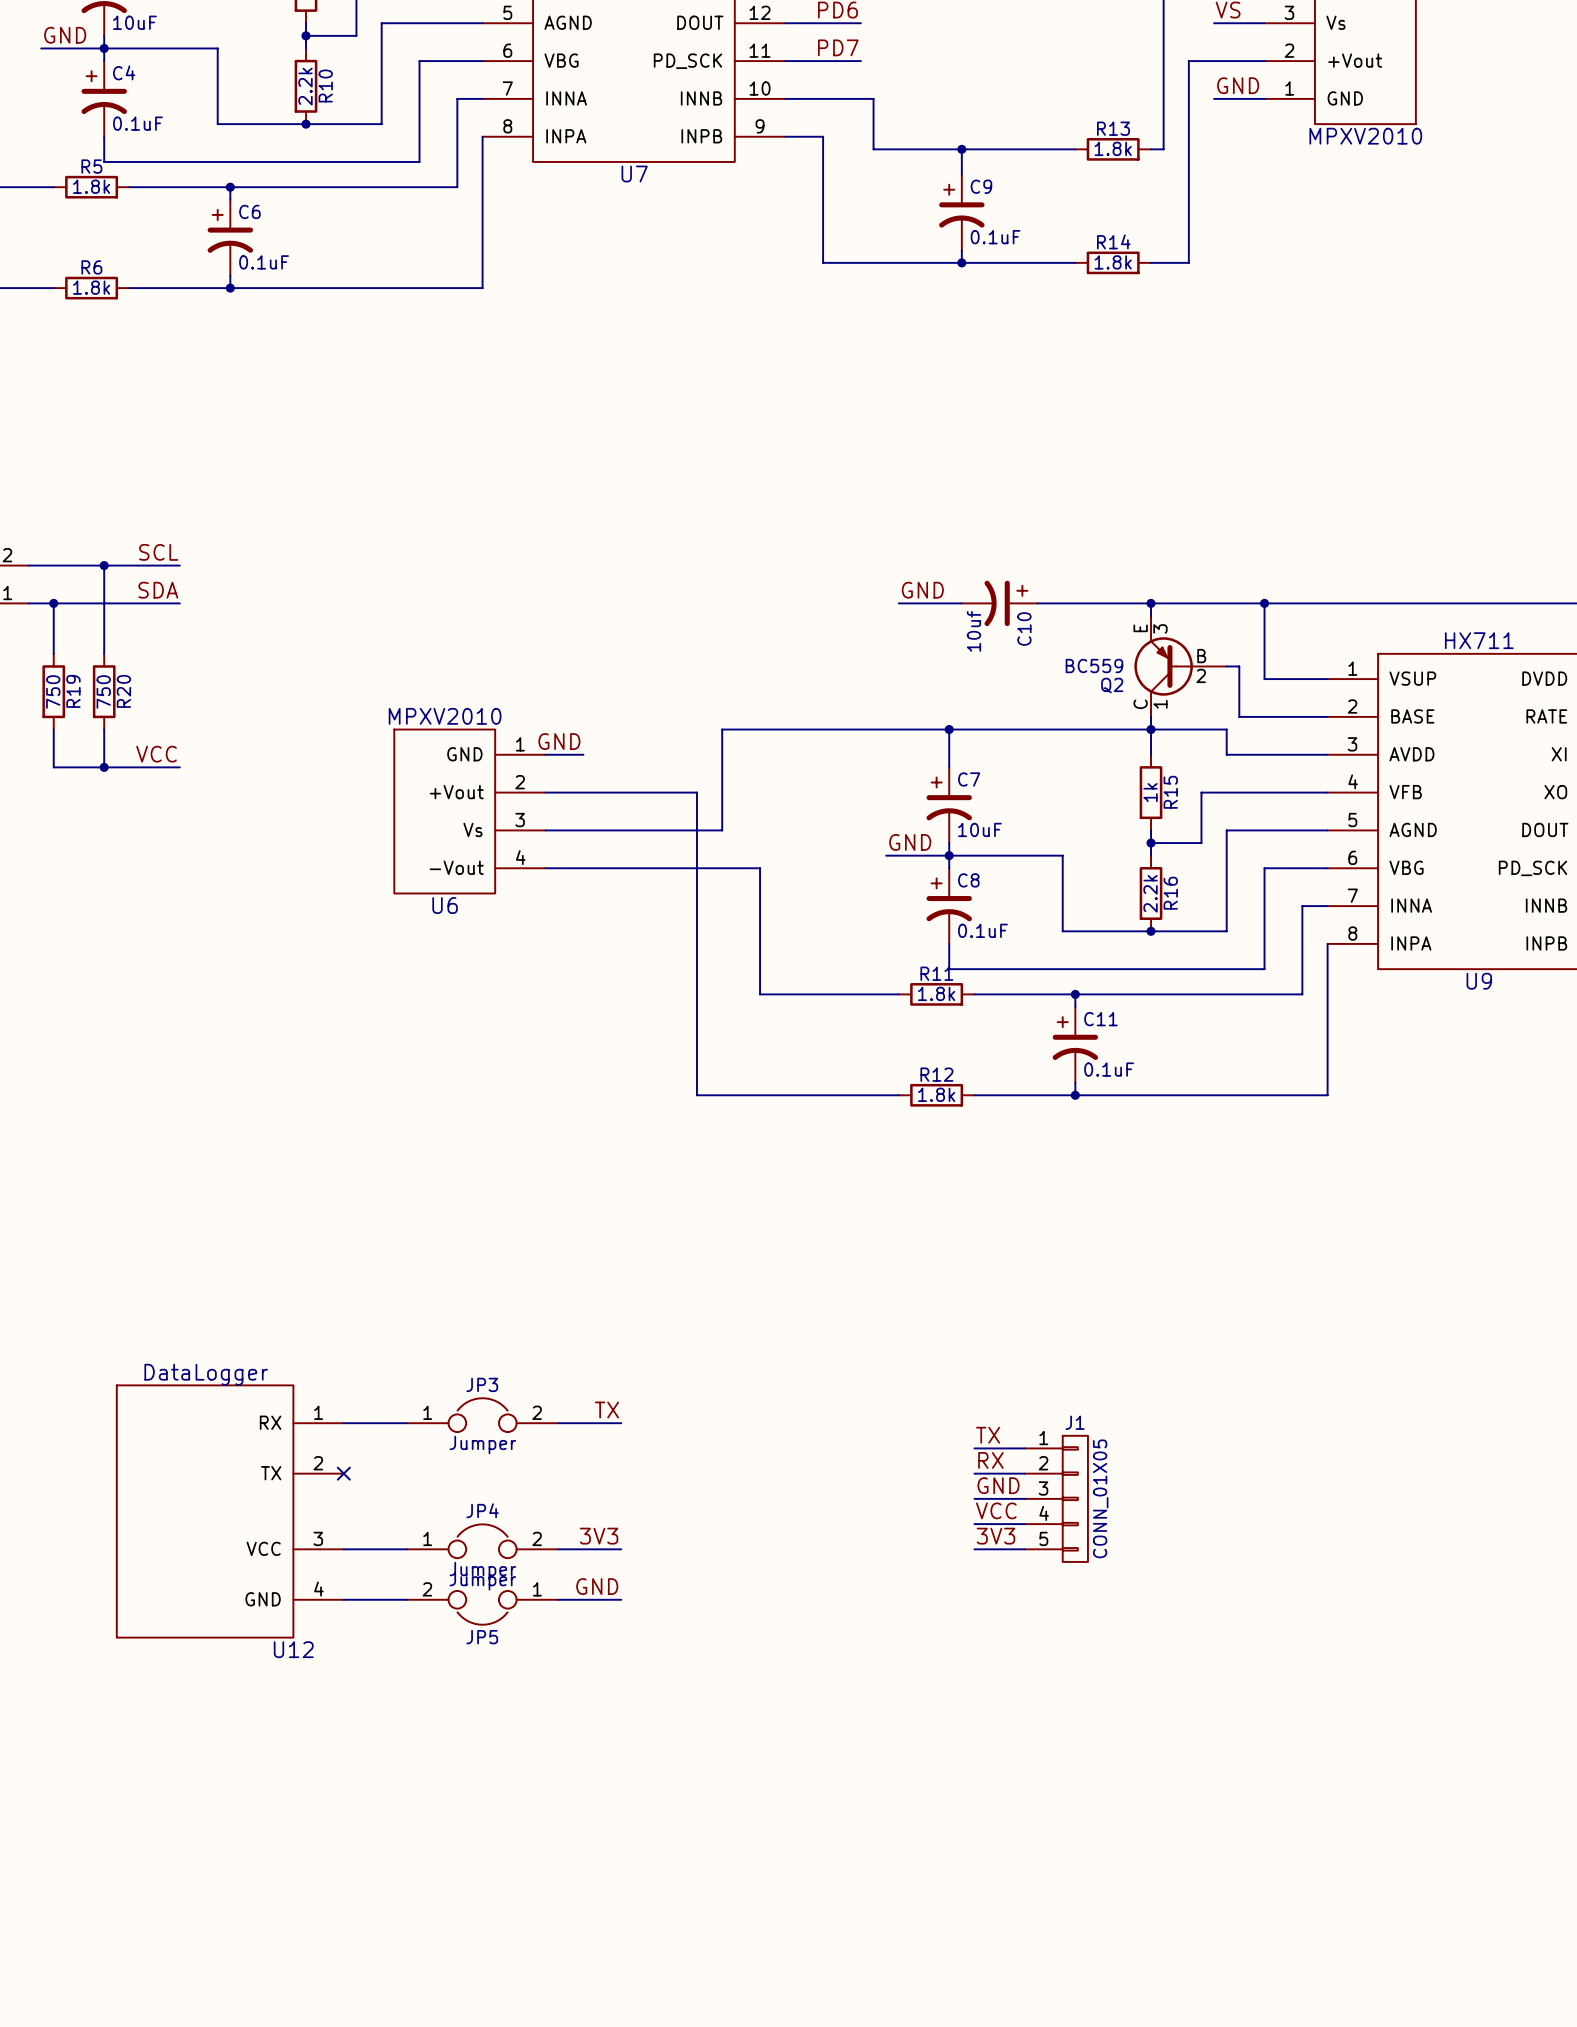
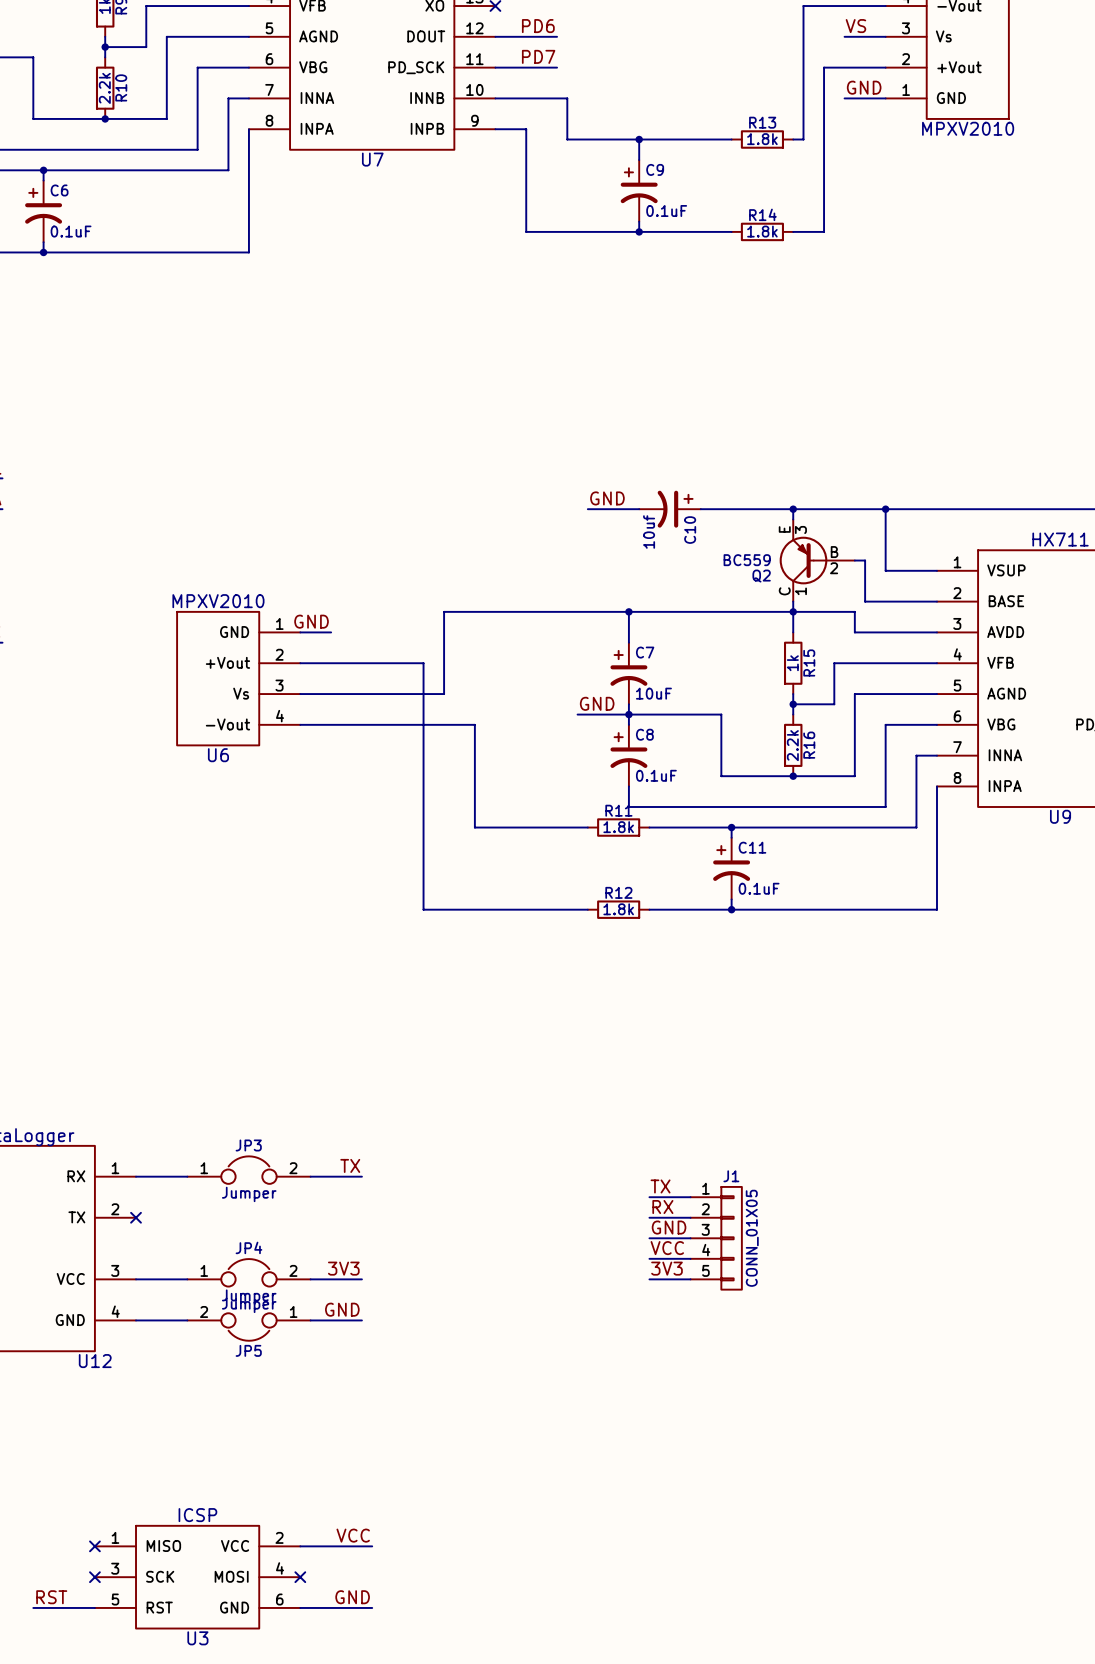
label: none -> VCC (353, 1535)
no-connect mark: none -> (94, 1546)
wire: none -> (300, 1546) (372, 1546)
no-connect mark: none -> (94, 1577)
U3: none -> ICSP (197, 1577)
no-connect mark: none -> (300, 1577)
label: none -> RST (51, 1597)
label: none -> GND (352, 1597)
wire: none -> (33, 1607) (94, 1607)
wire: none -> (300, 1607) (372, 1607)

